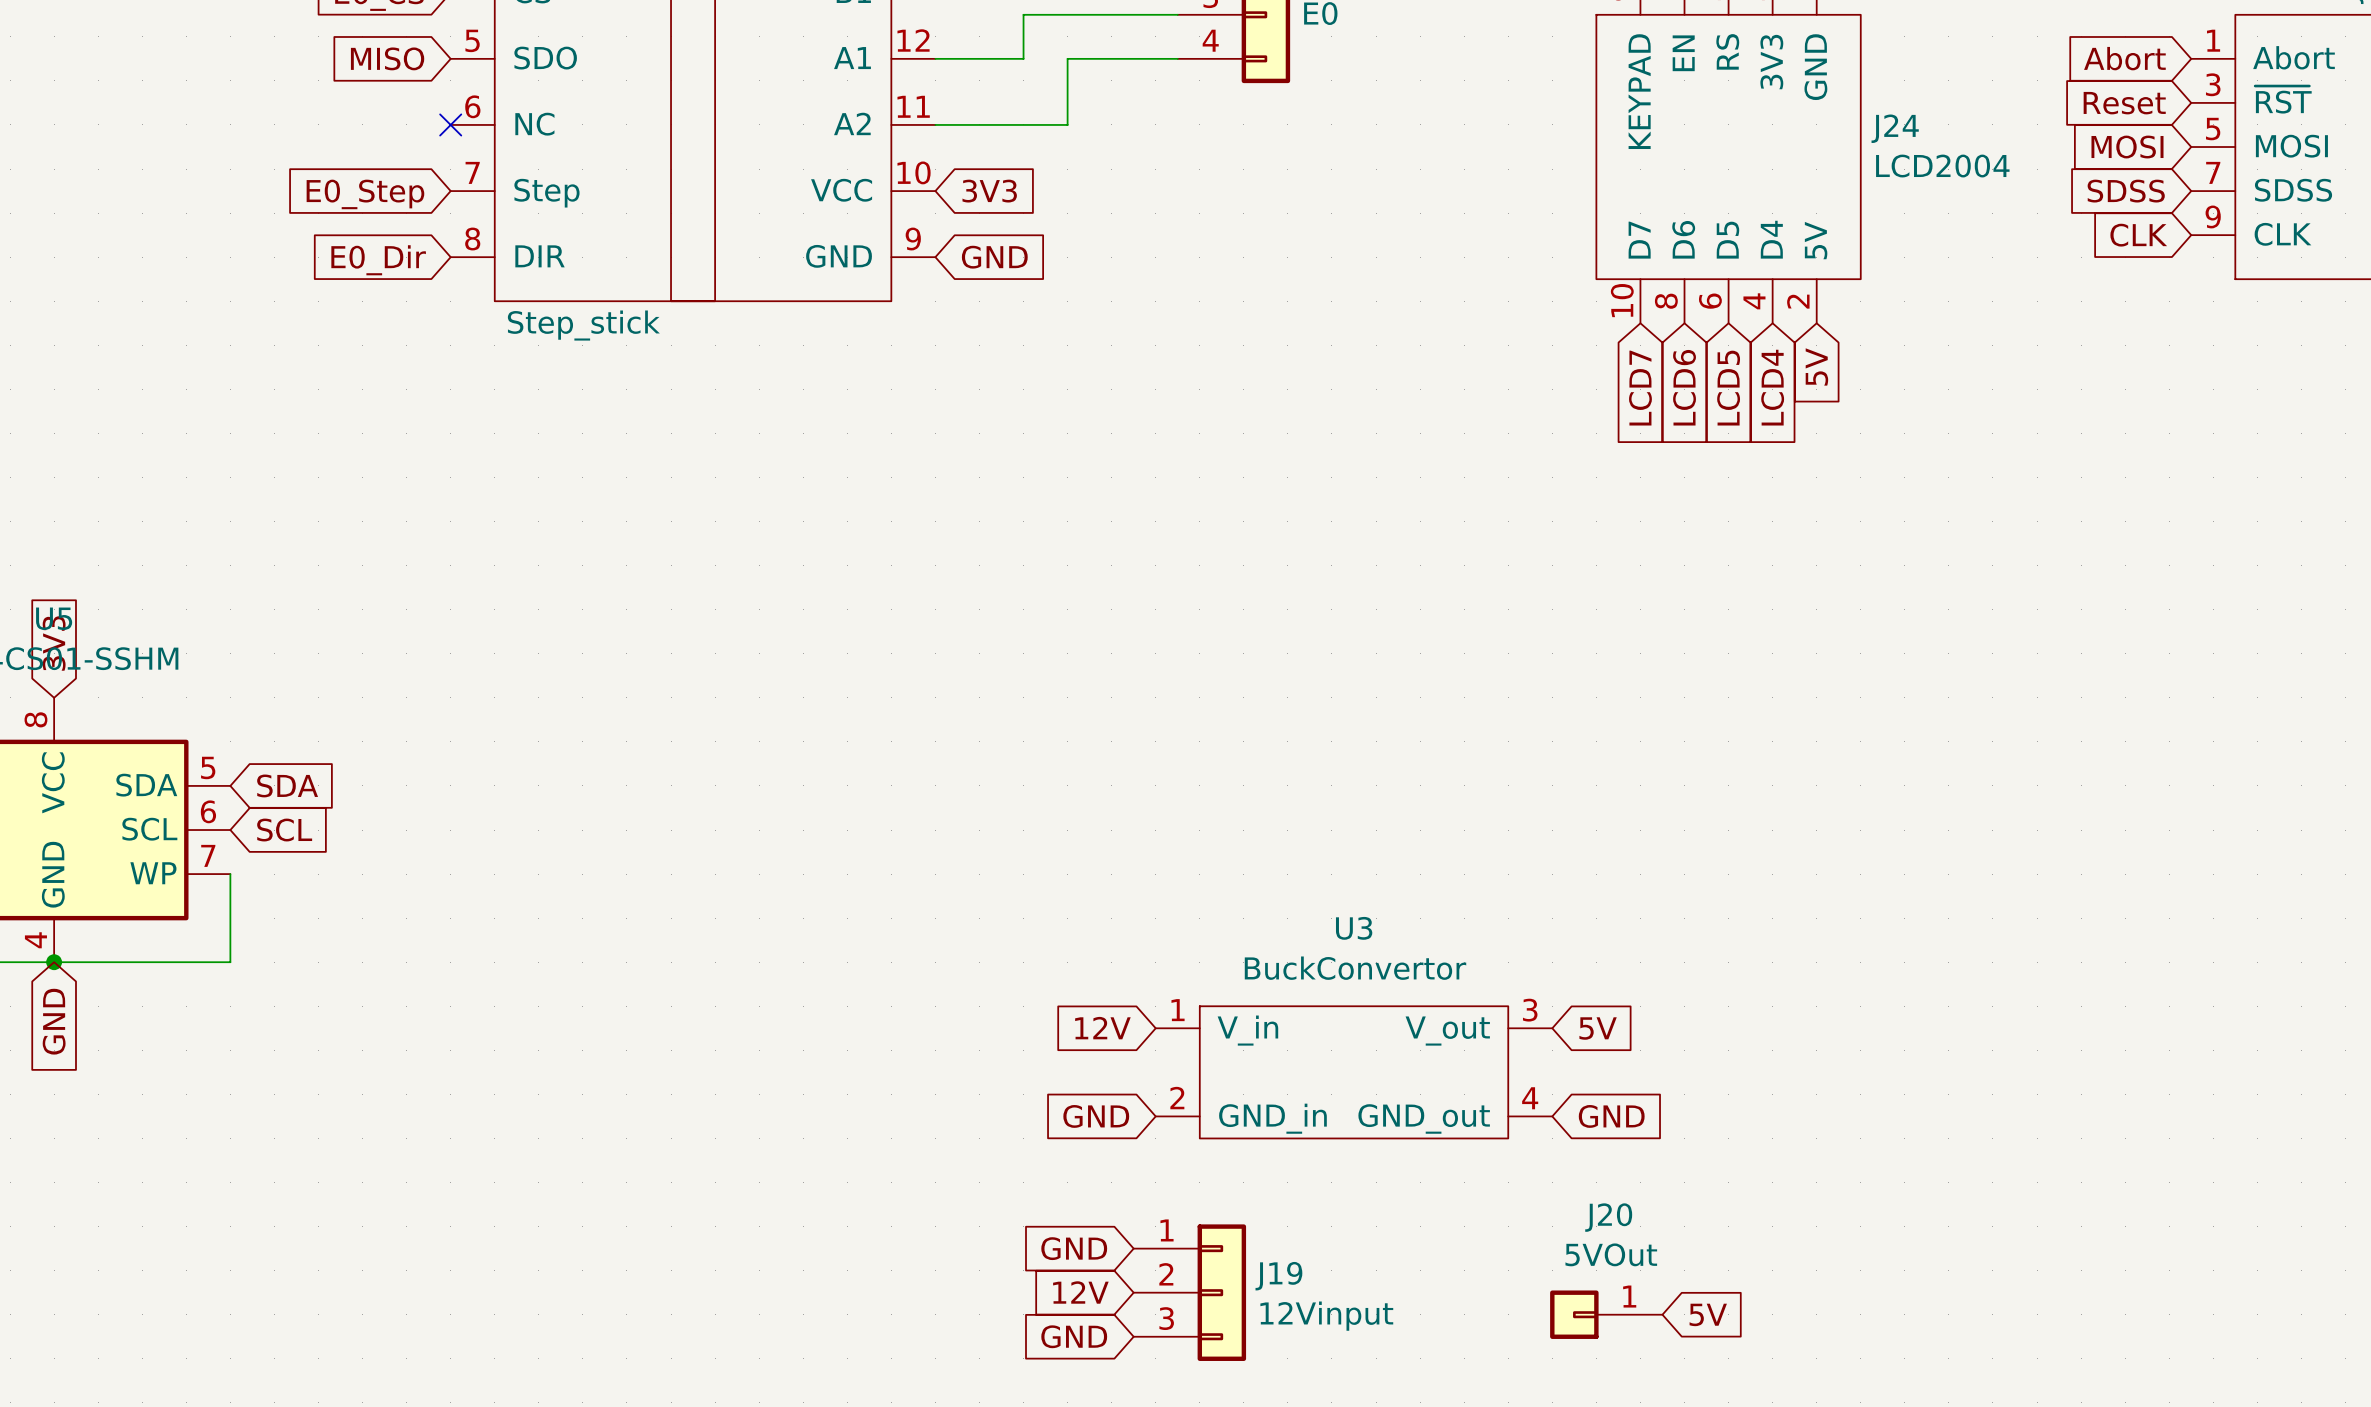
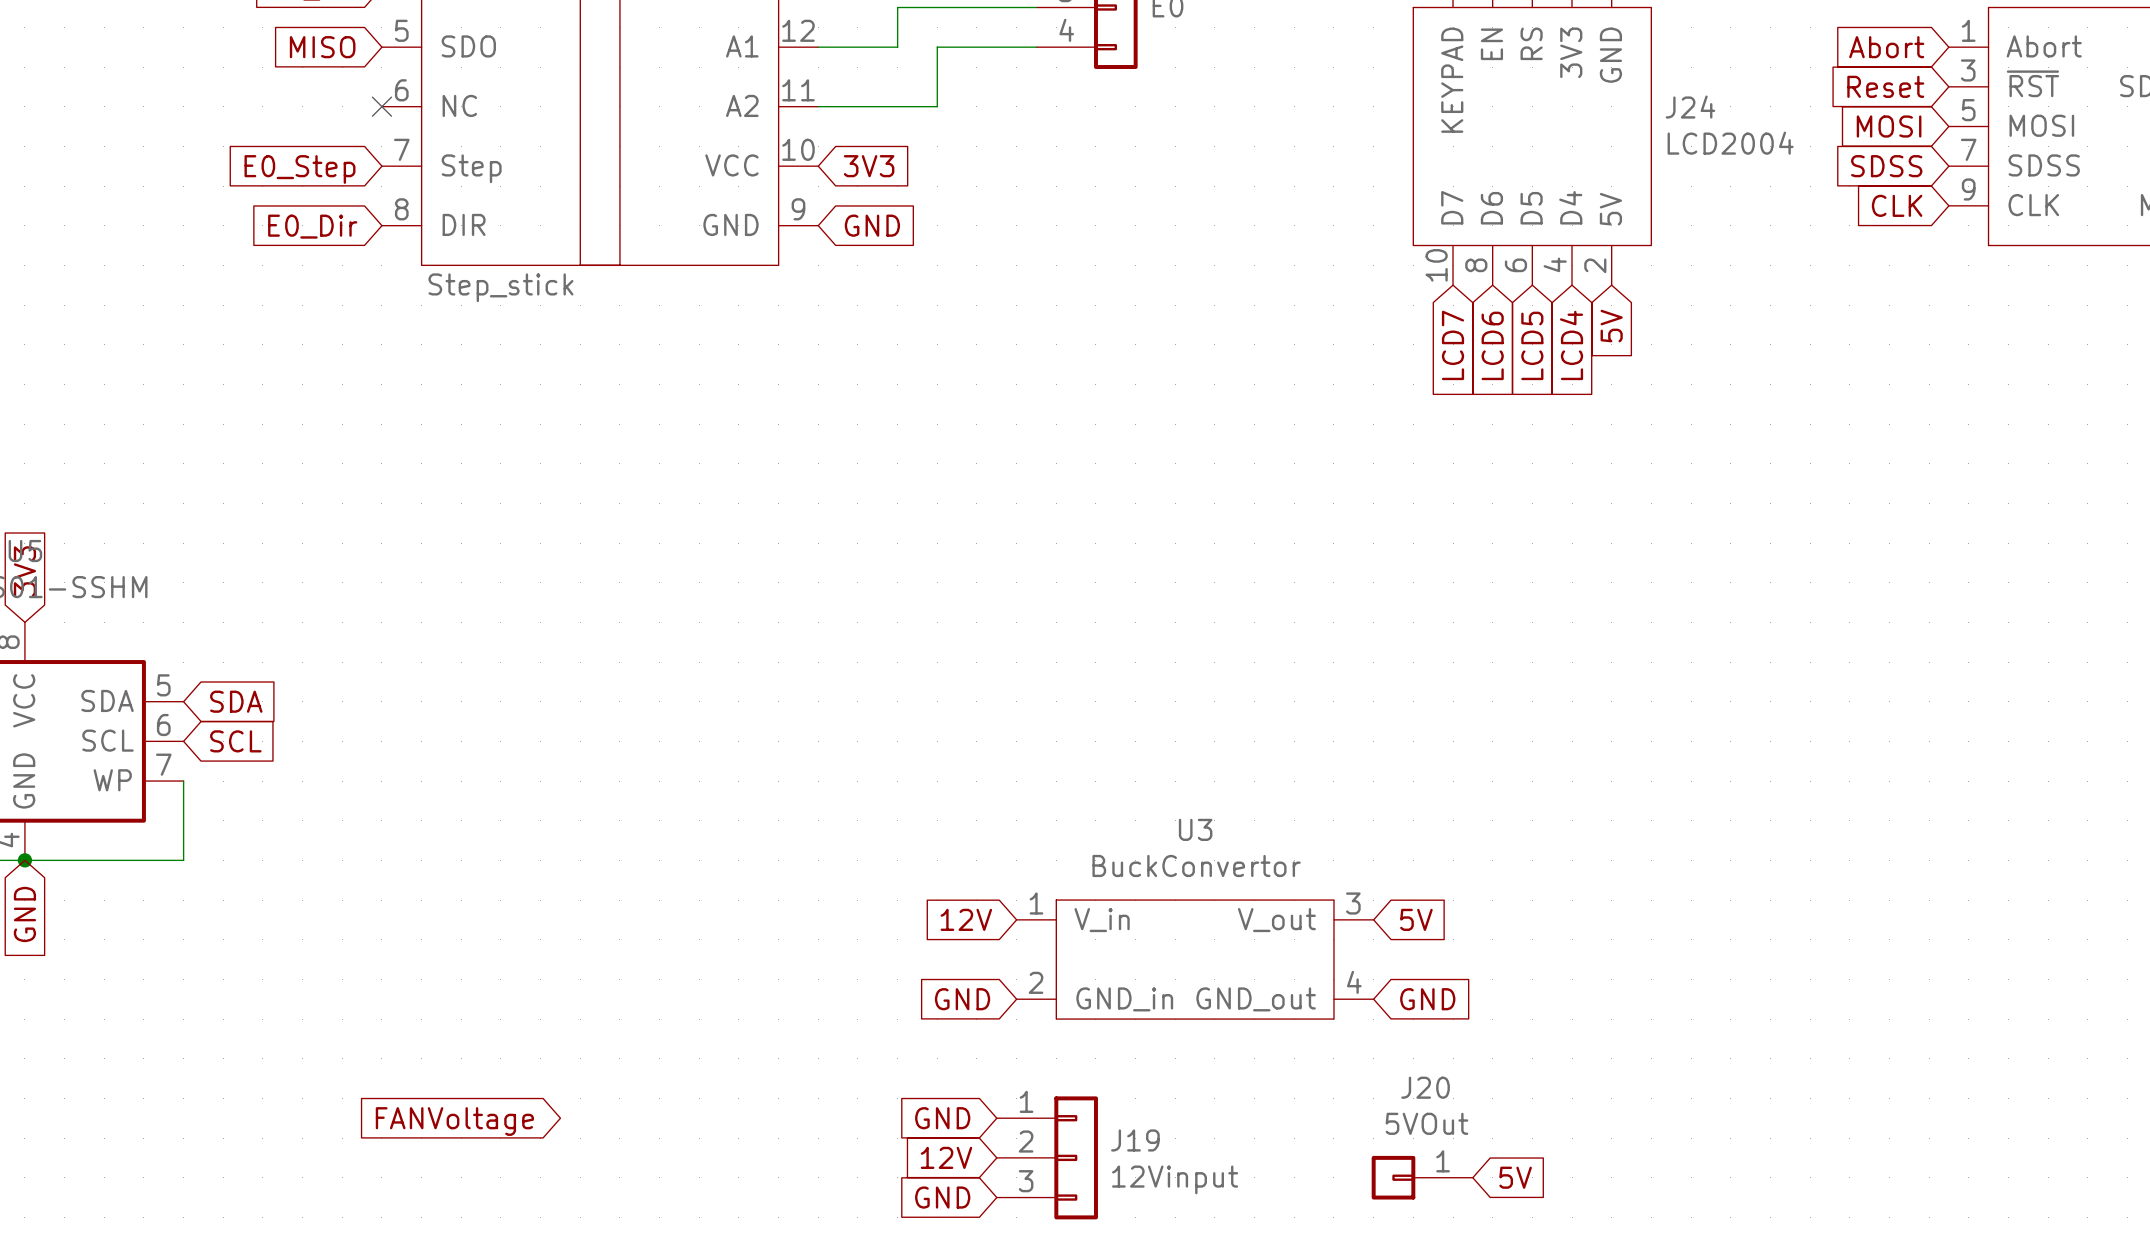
global label: none -> FANVoltage (454, 1121)

